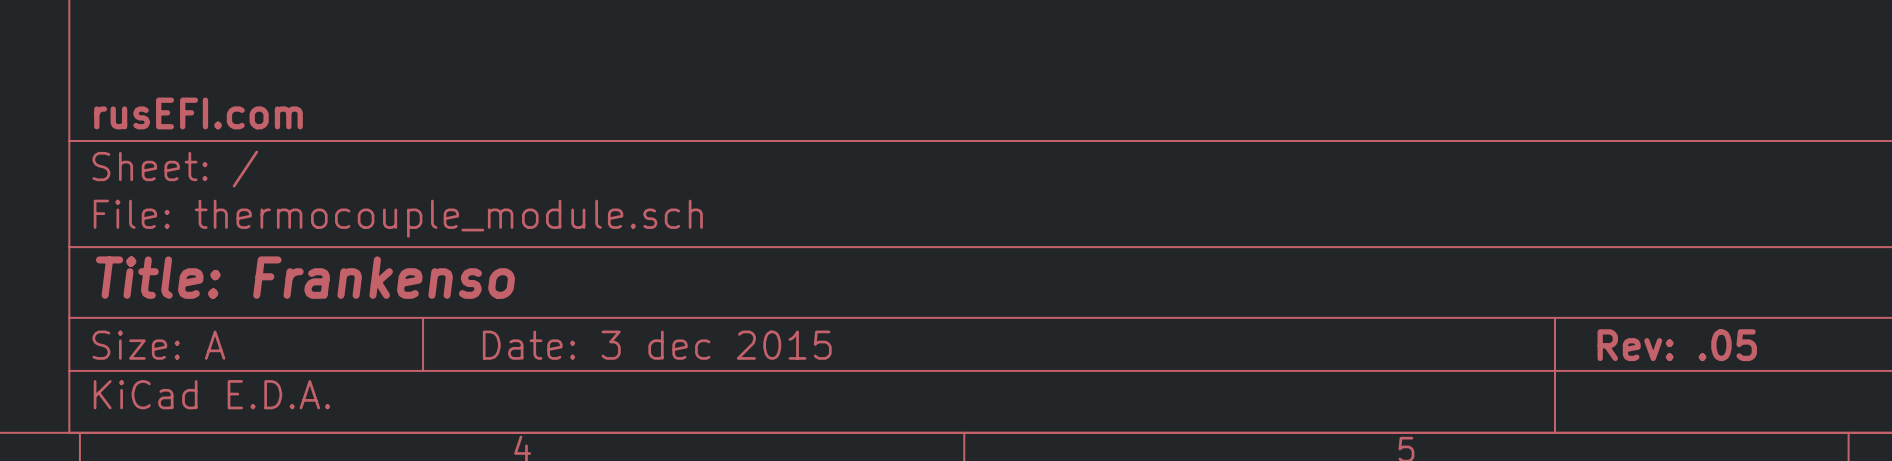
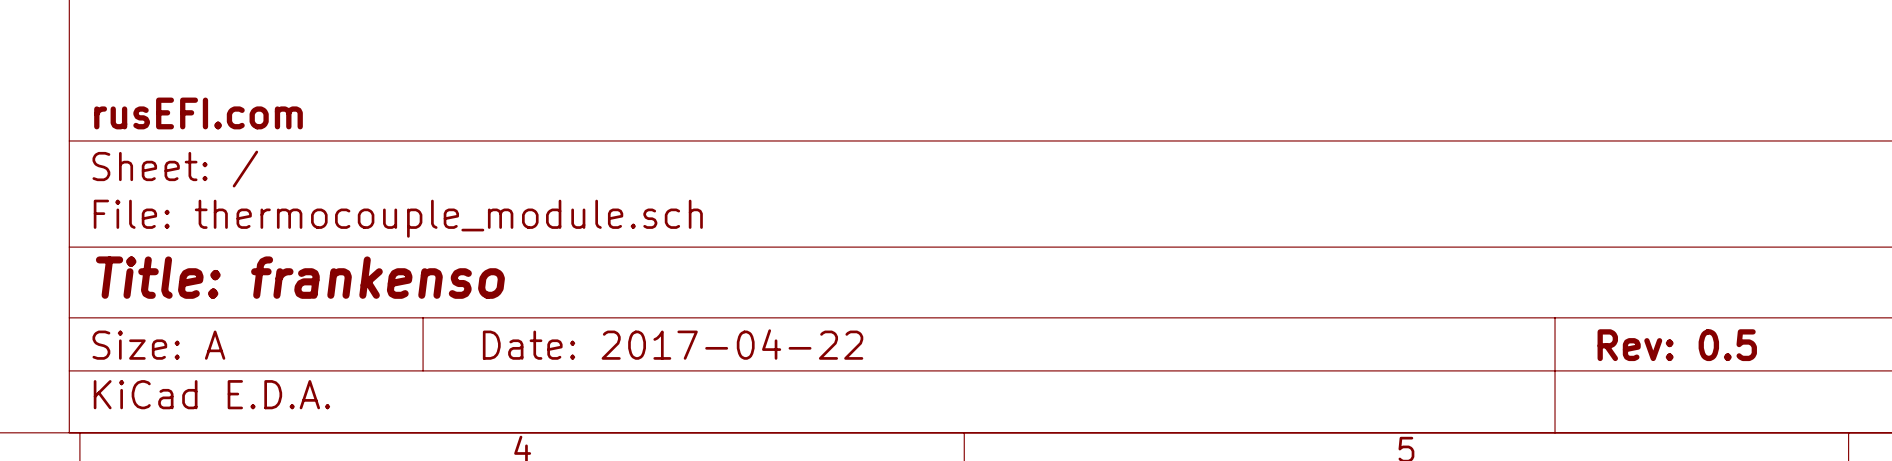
title block: Title: Frankenso (305, 277) -> Title: frankenso (300, 277)
title block: Date: 3 dec 2015 (657, 345) -> Date: 2017-04-22 (673, 344)
title block: Rev: .05 (1677, 345) -> Rev: 0.5 (1677, 345)

